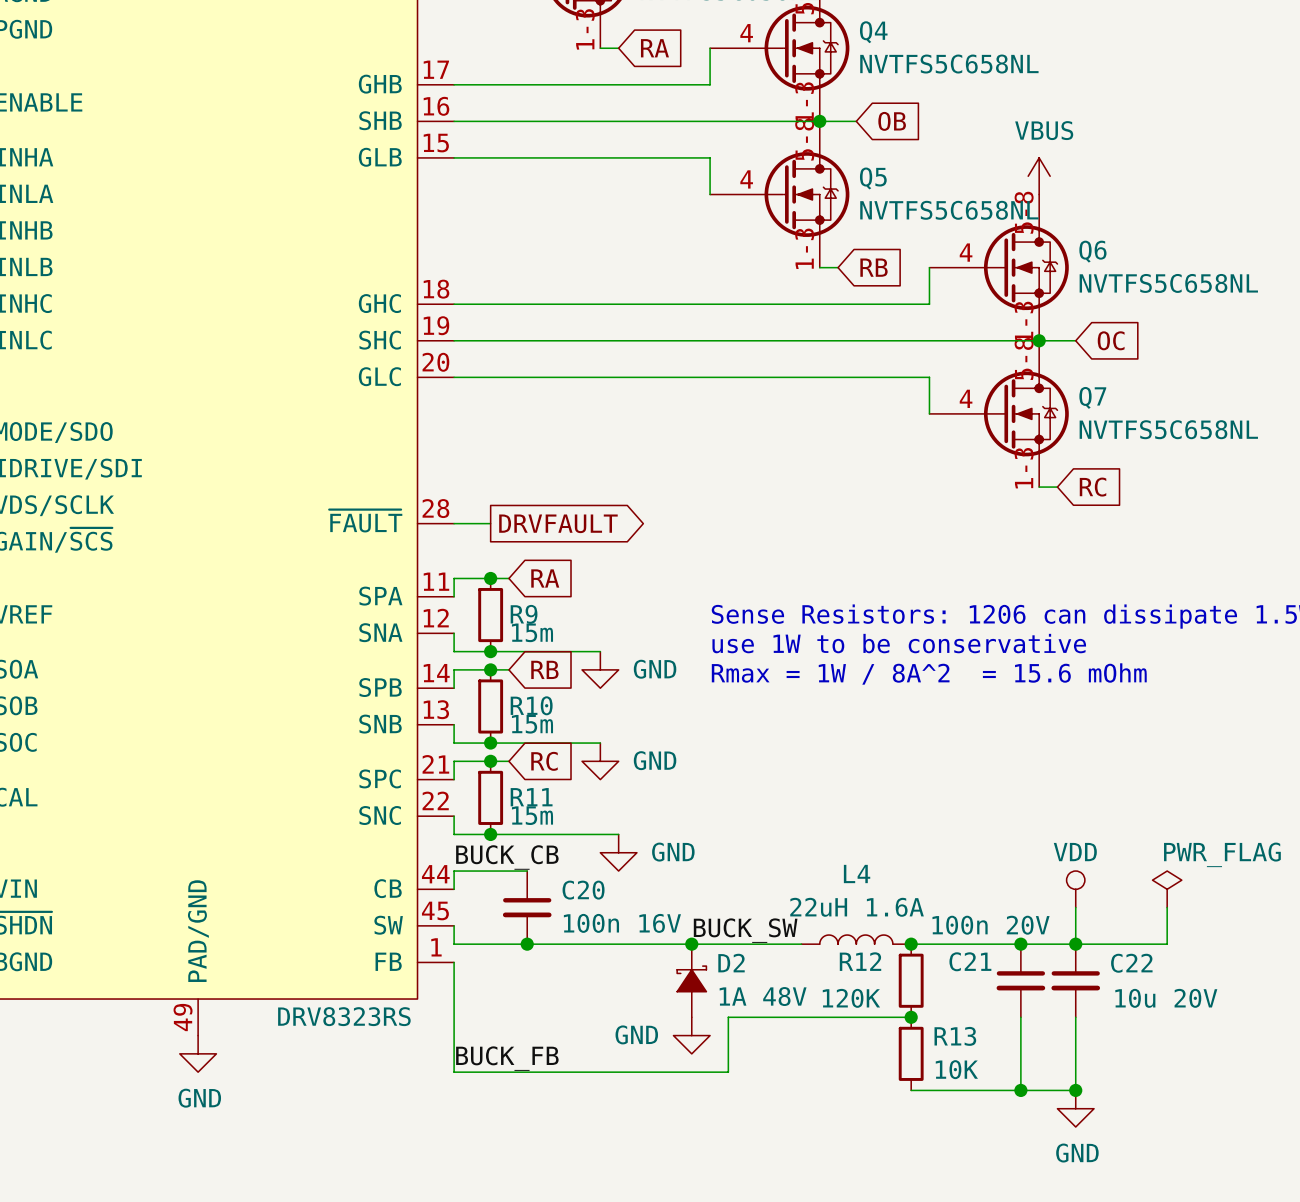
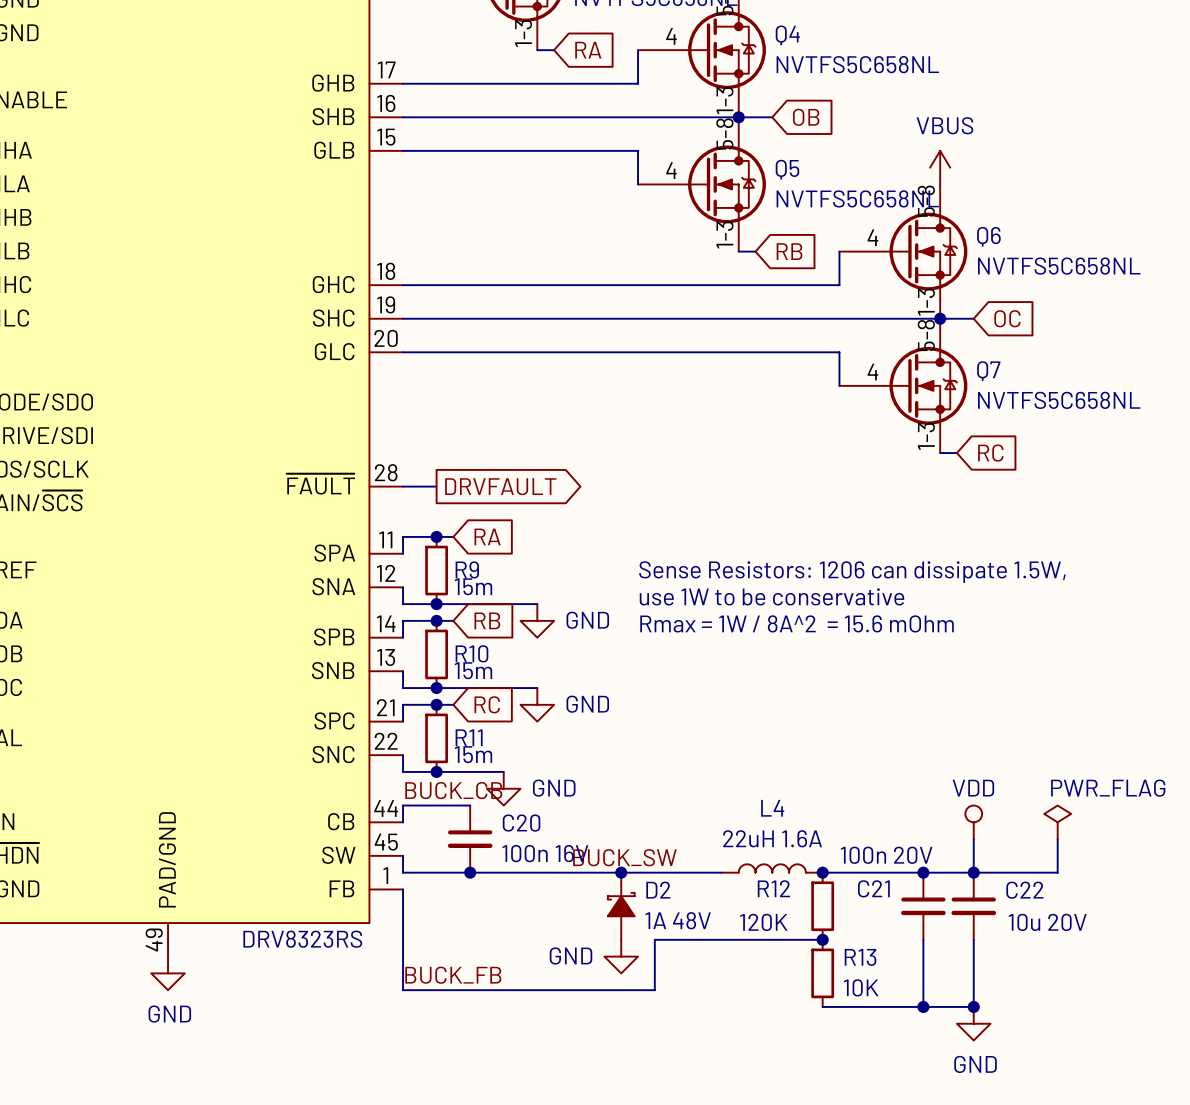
wire: (563, 834) (618, 834) -> none
power symbol position: GND (618, 852) -> GND (503, 788)
label position: BUCK_SW (745, 930) -> BUCK_SW (624, 857)

